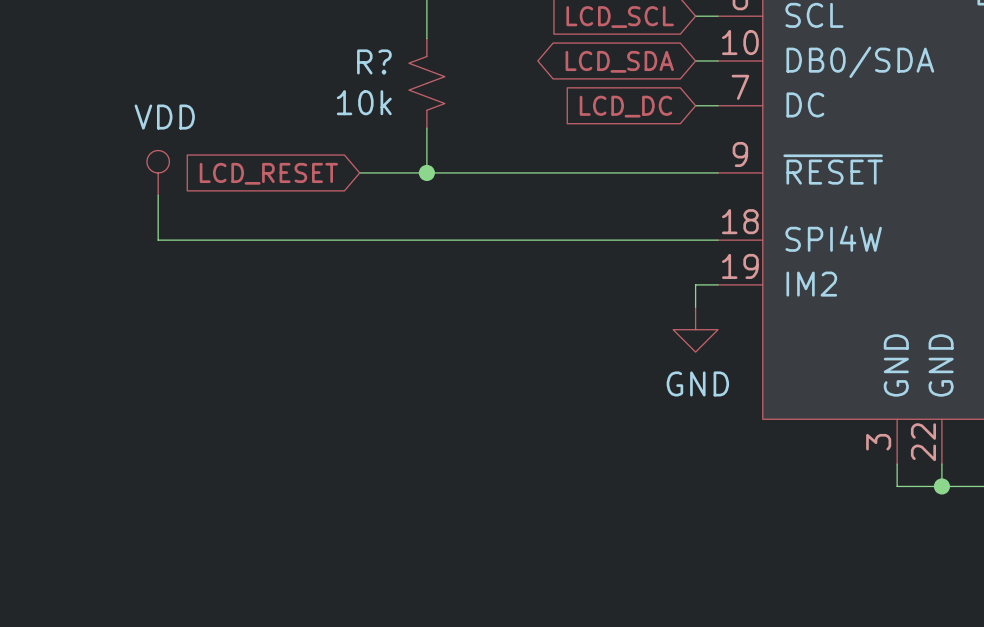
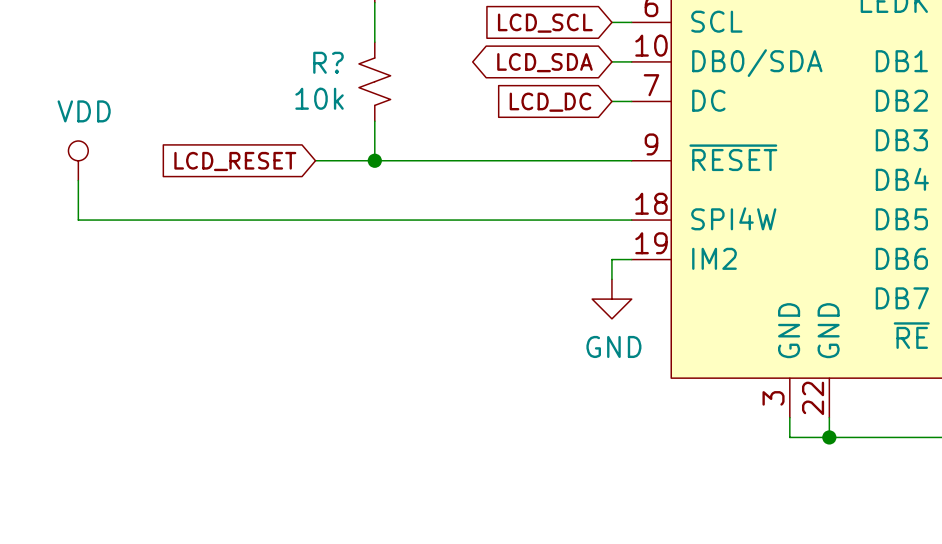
power symbol position: VDD (158, 172) -> VDD (78, 160)
wire: (158, 195) (158, 240) -> (78, 180) (78, 220) (137, 220)

